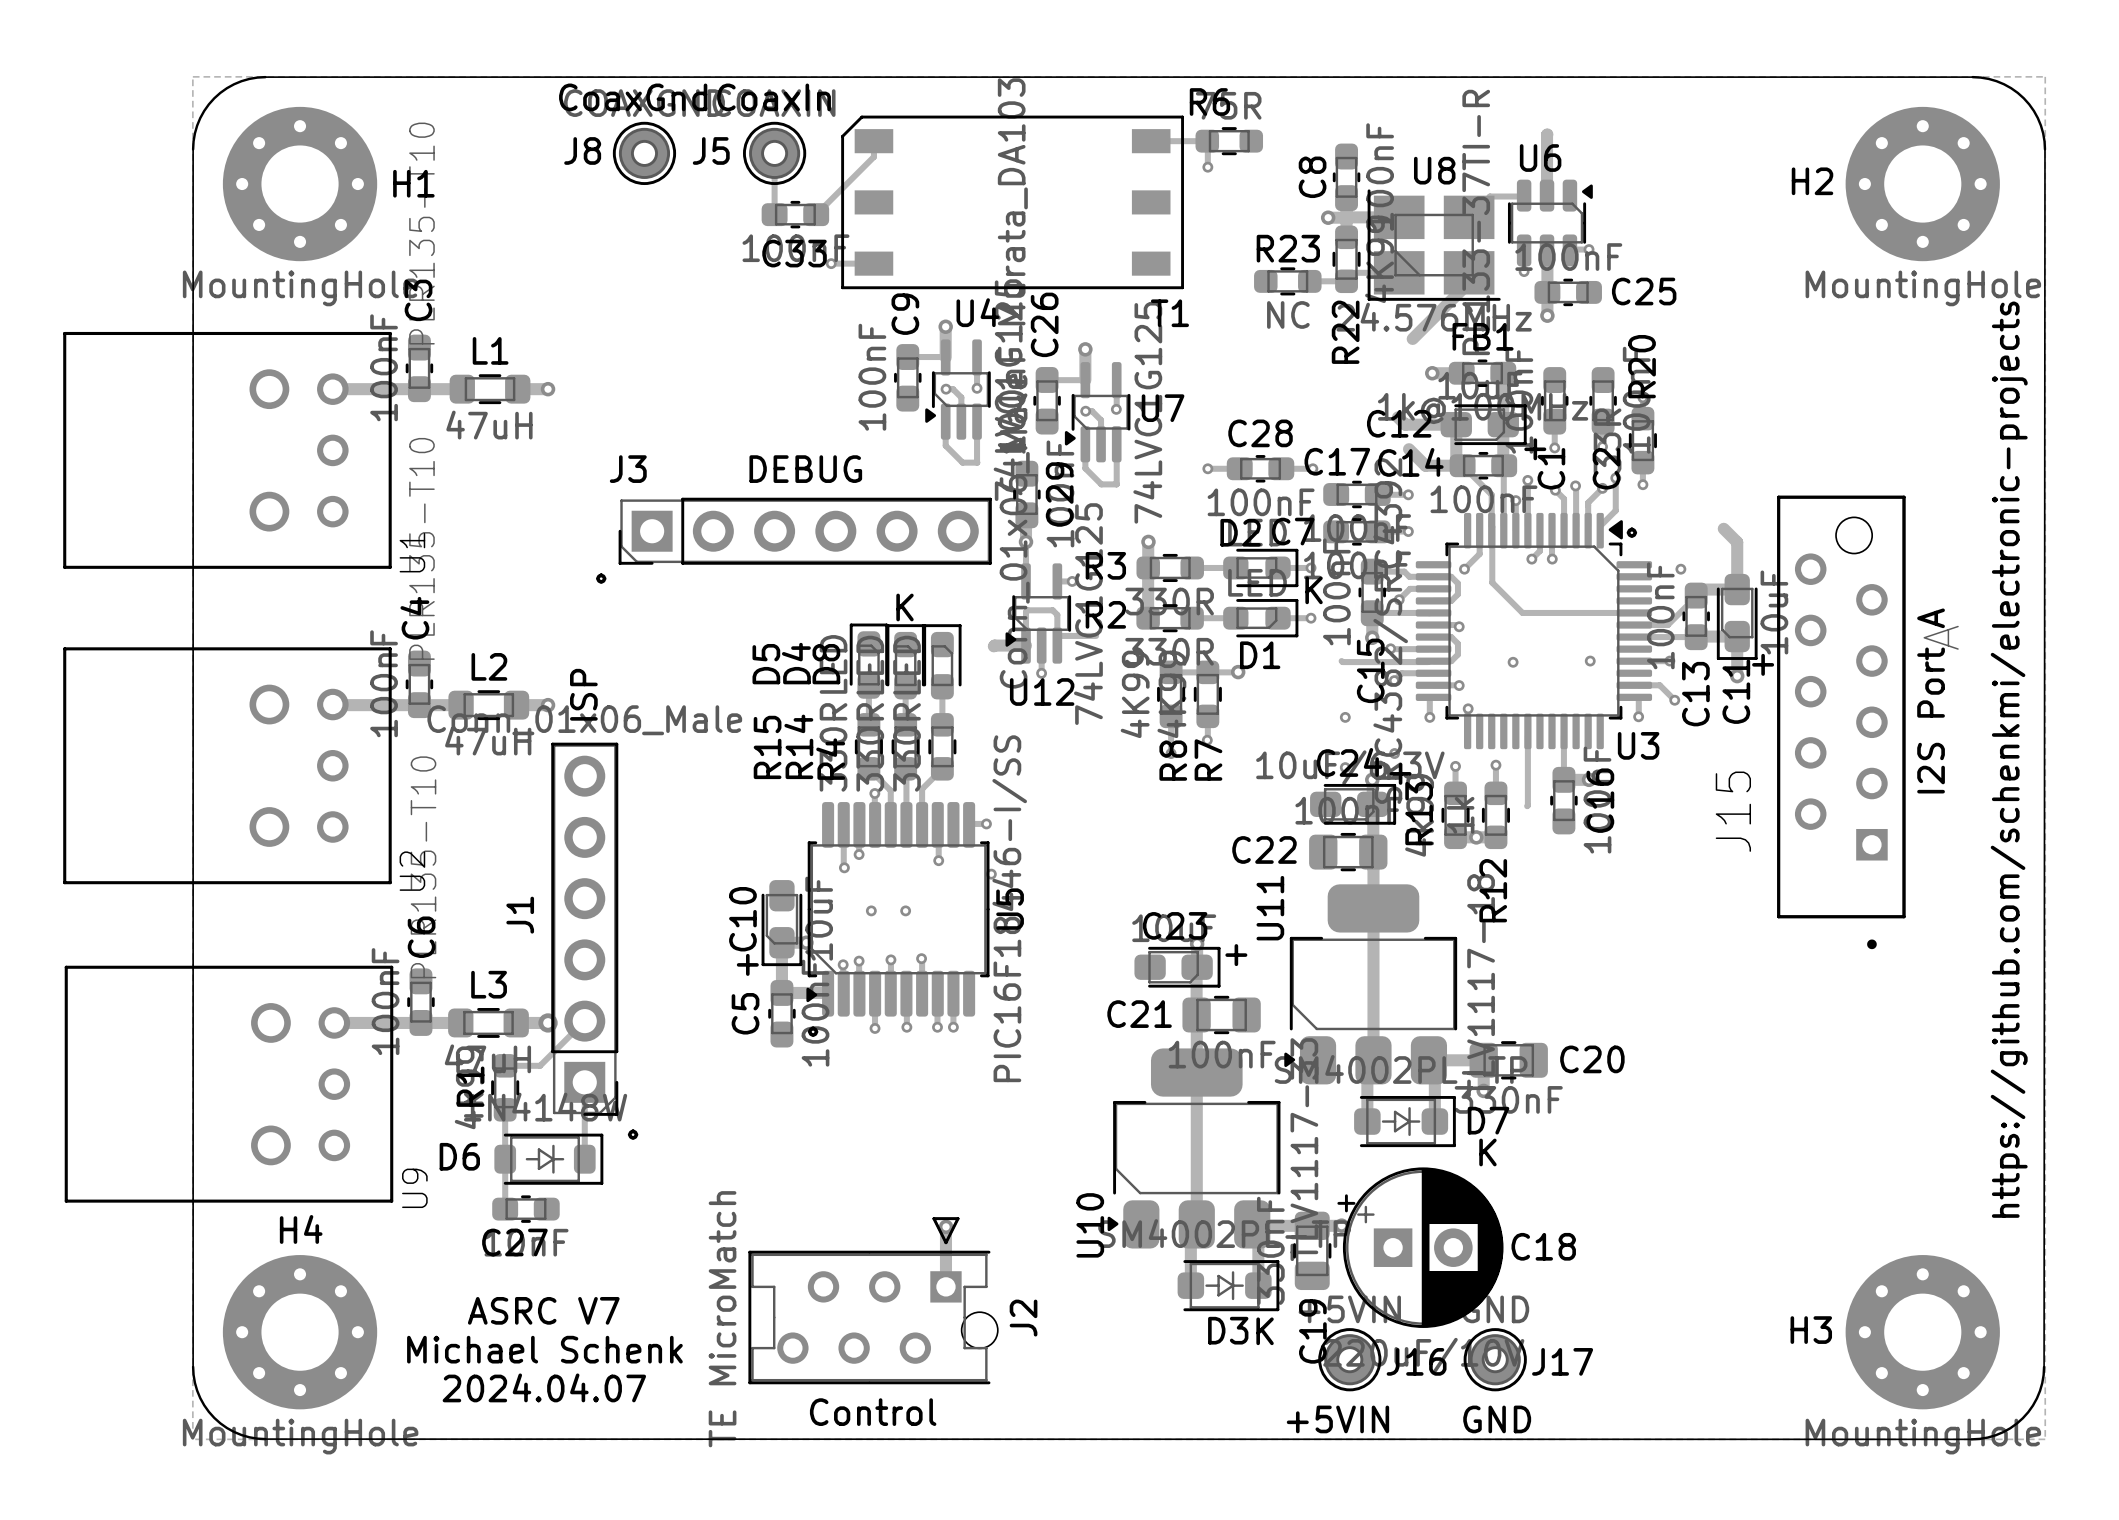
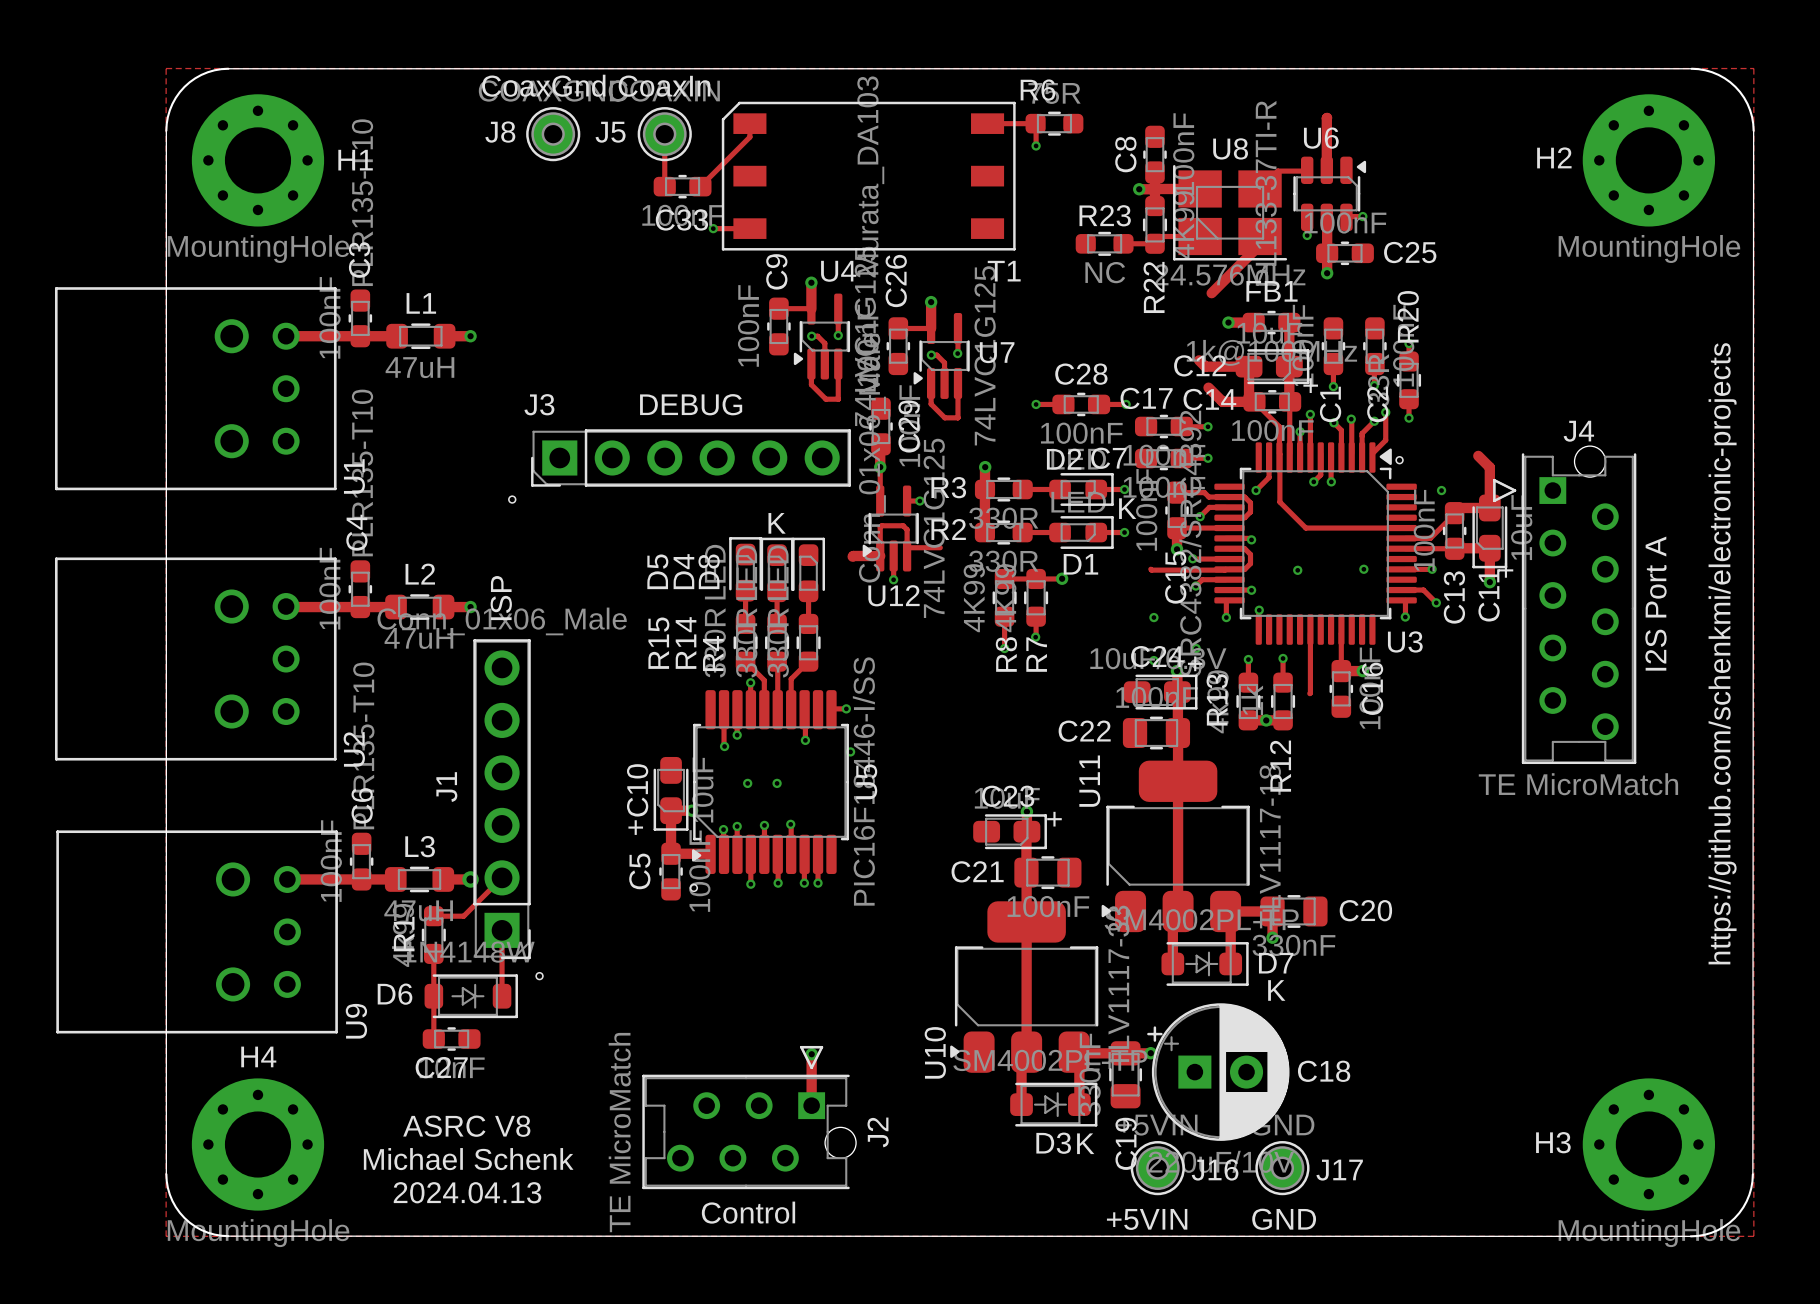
J4: none -> TE MicroMatch (1564, 605)
J15: A (1841, 722) -> none
text: ASRC V7 (543, 1310) -> ASRC V8 (466, 1126)
text: 2024.04.07 (544, 1387) -> 2024.04.13 (467, 1192)

